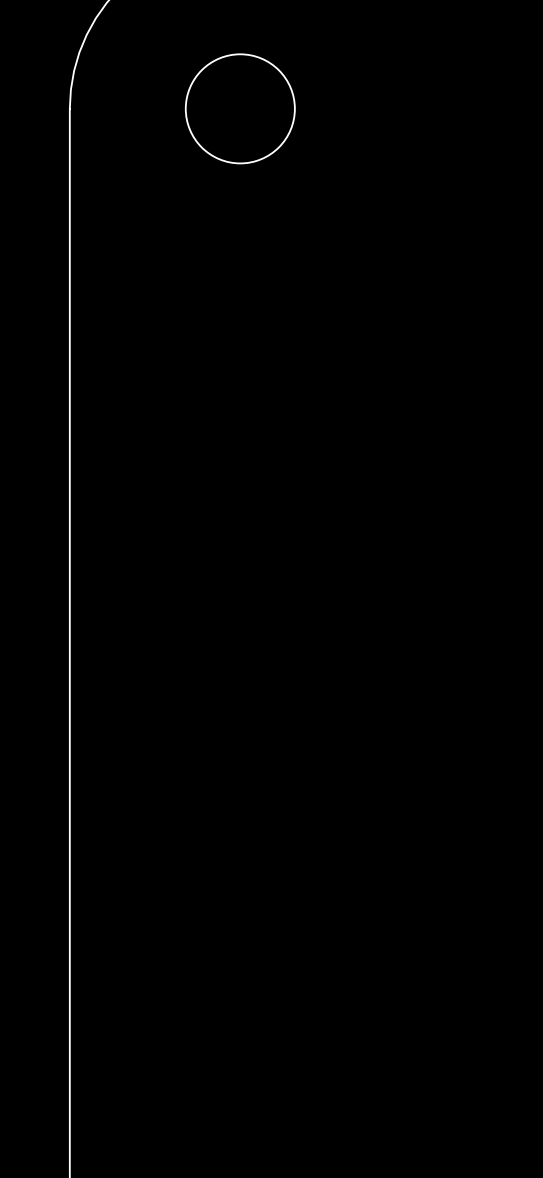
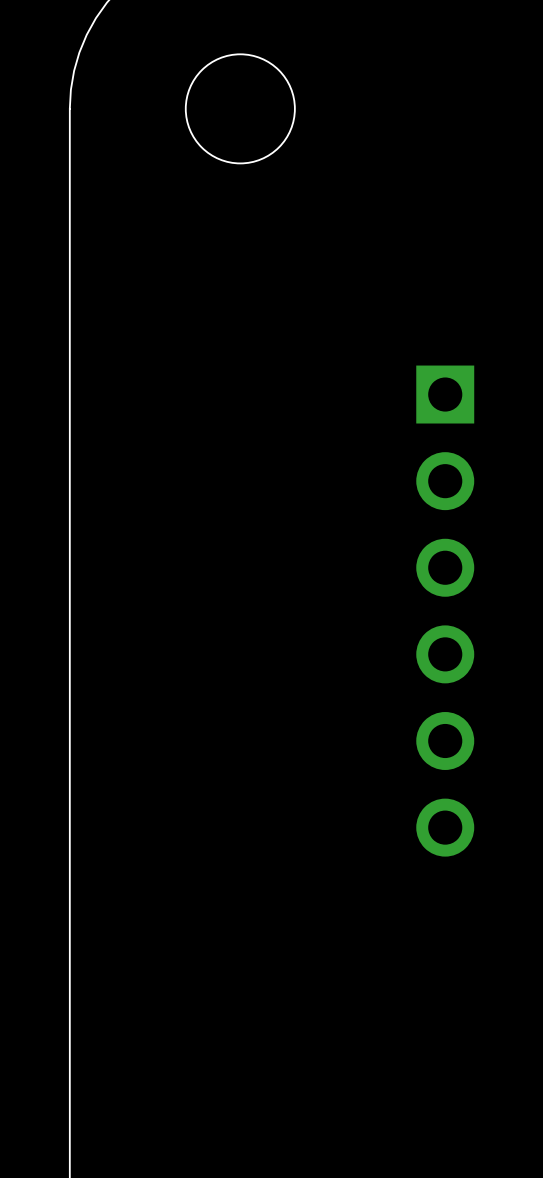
part: none -> (445, 611)

